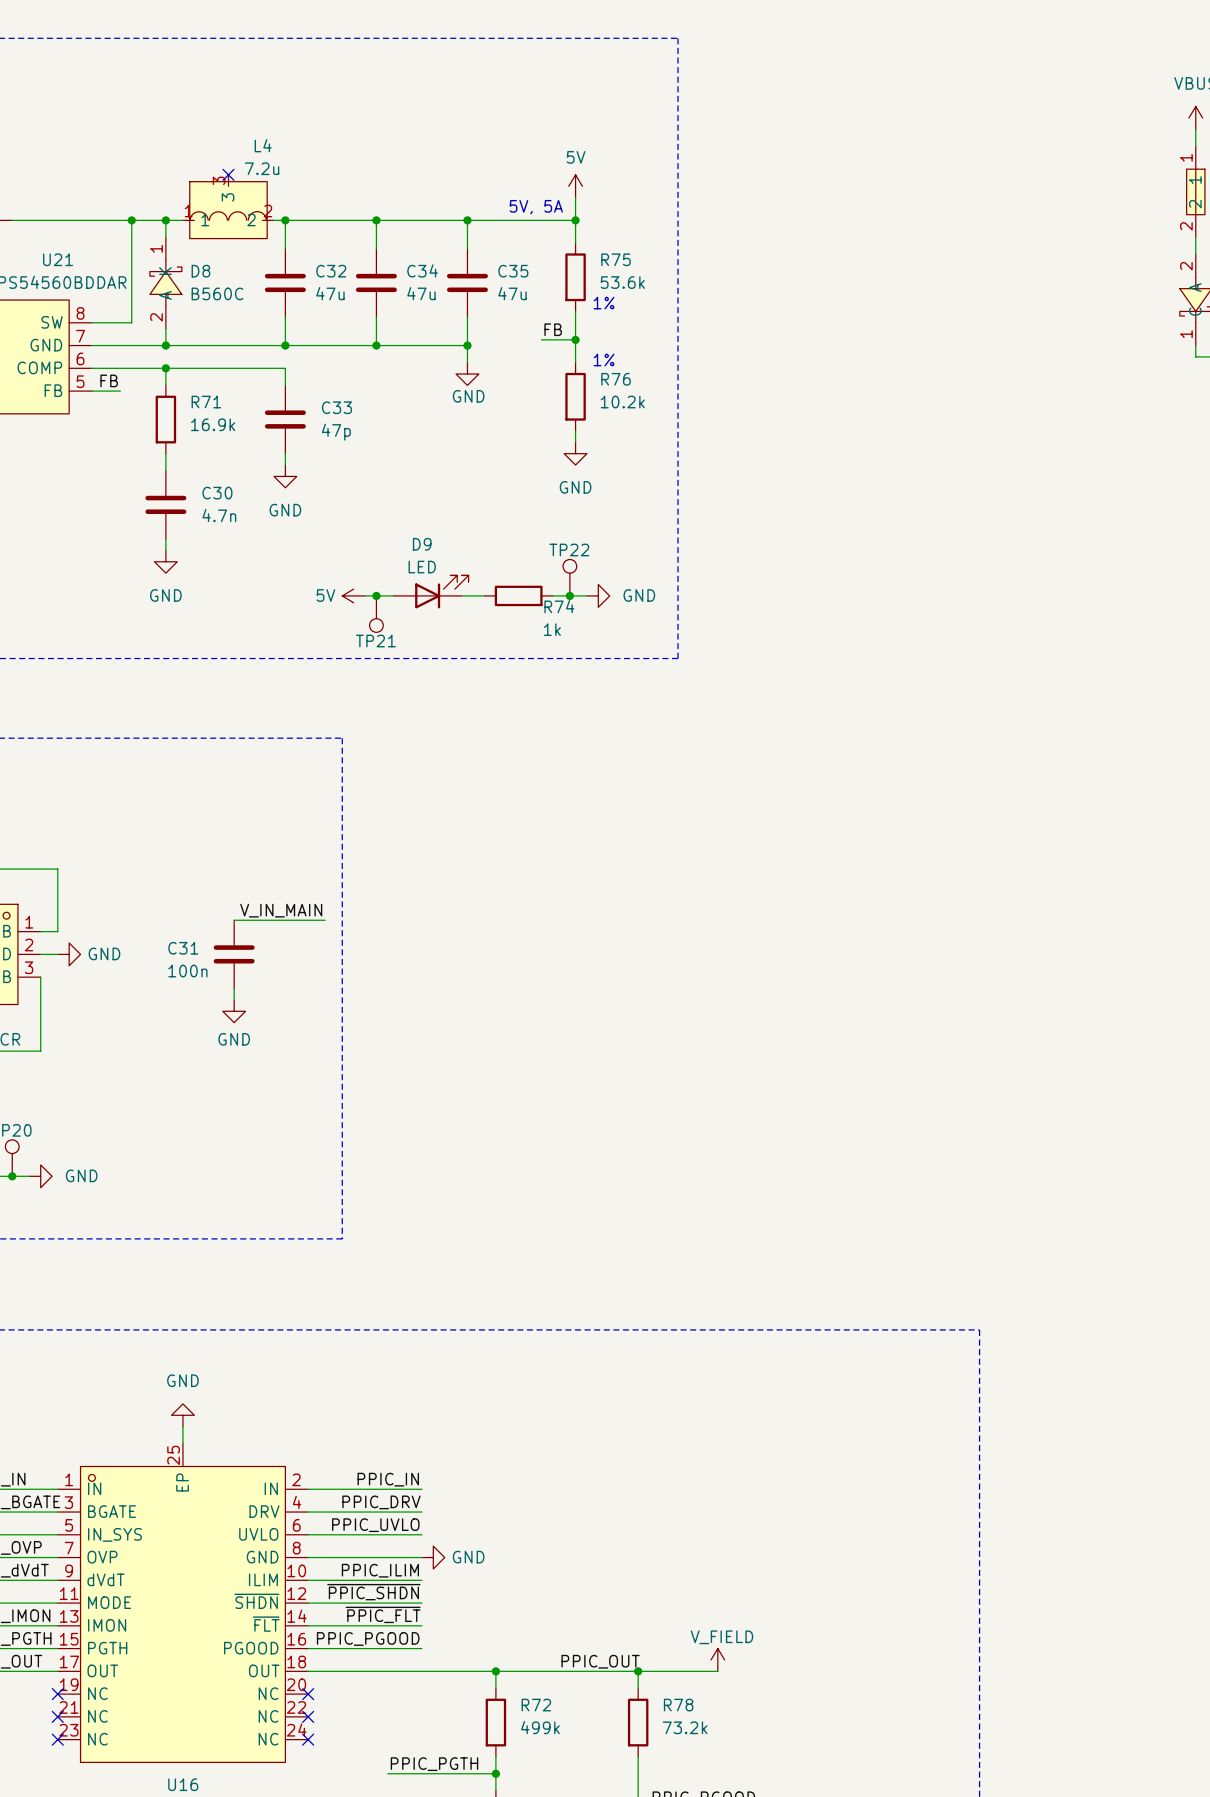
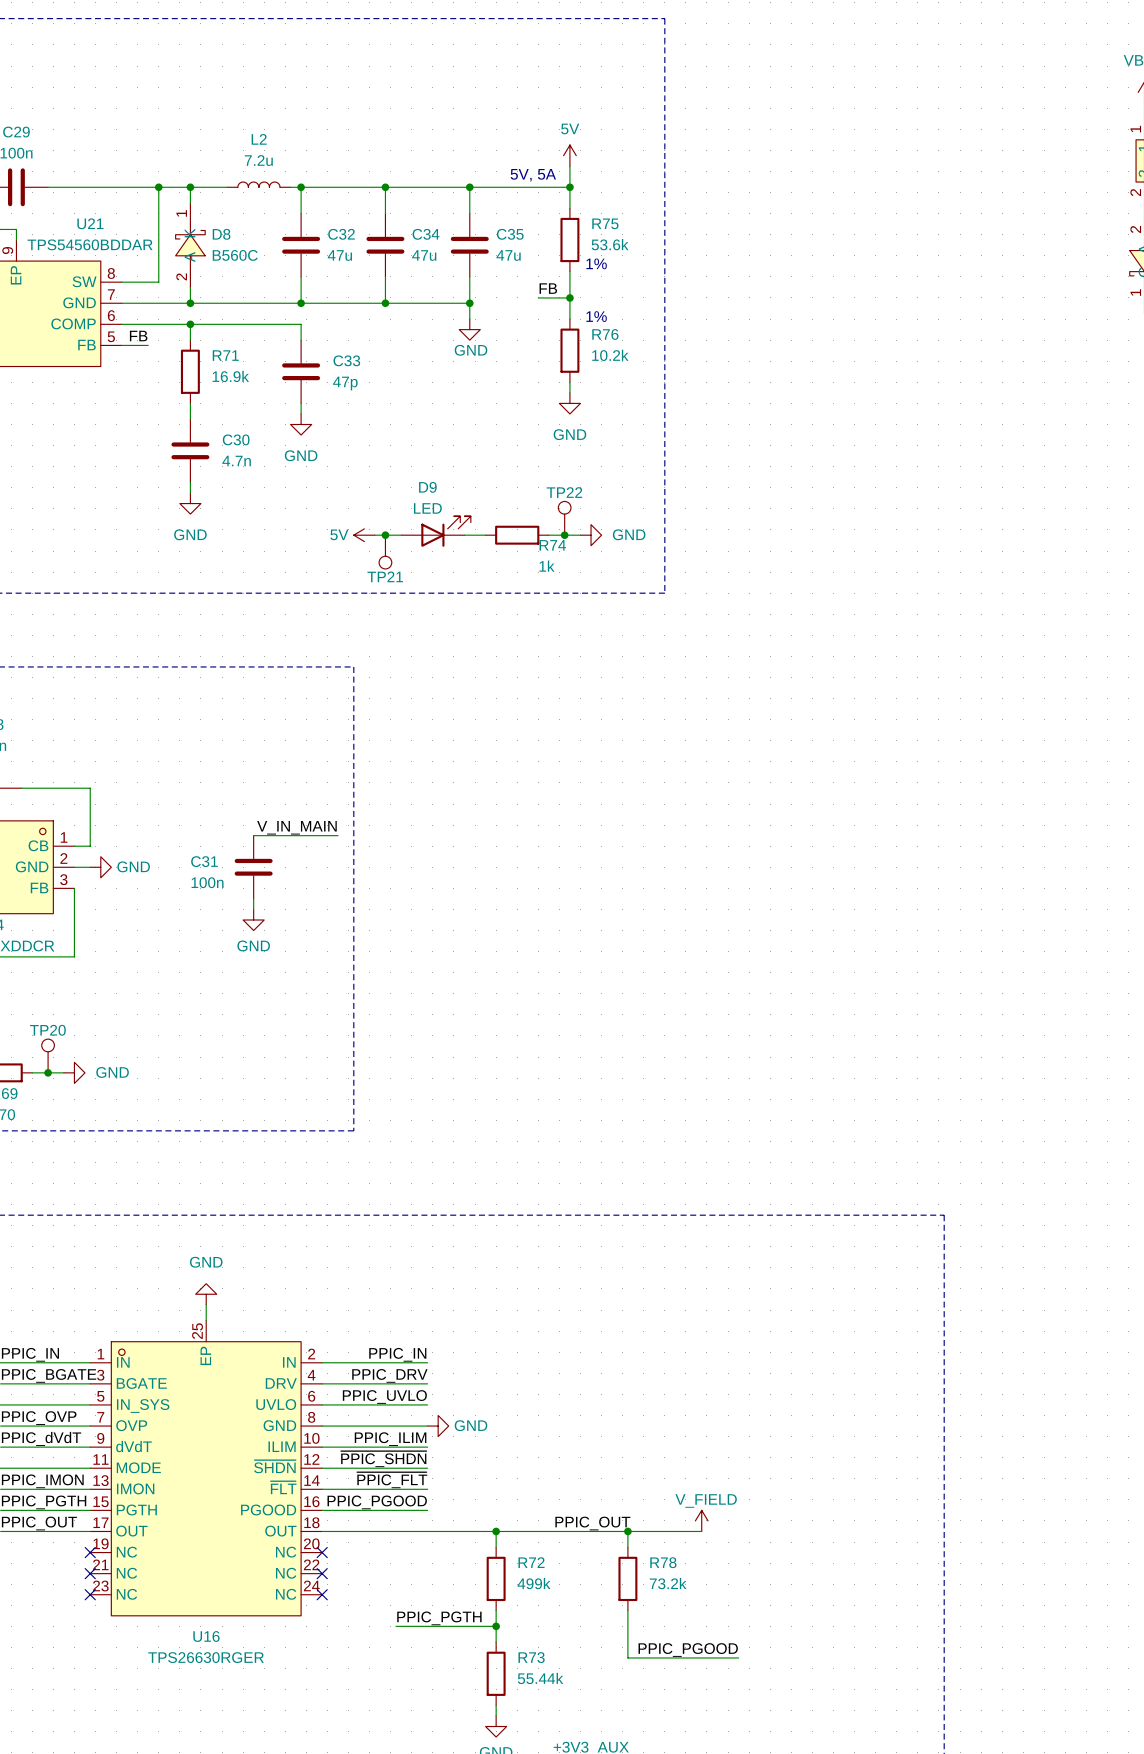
no-connect mark: (228, 174) -> none
L4: 7.2u (228, 206) -> none
L2: none -> 7.2u (258, 184)

